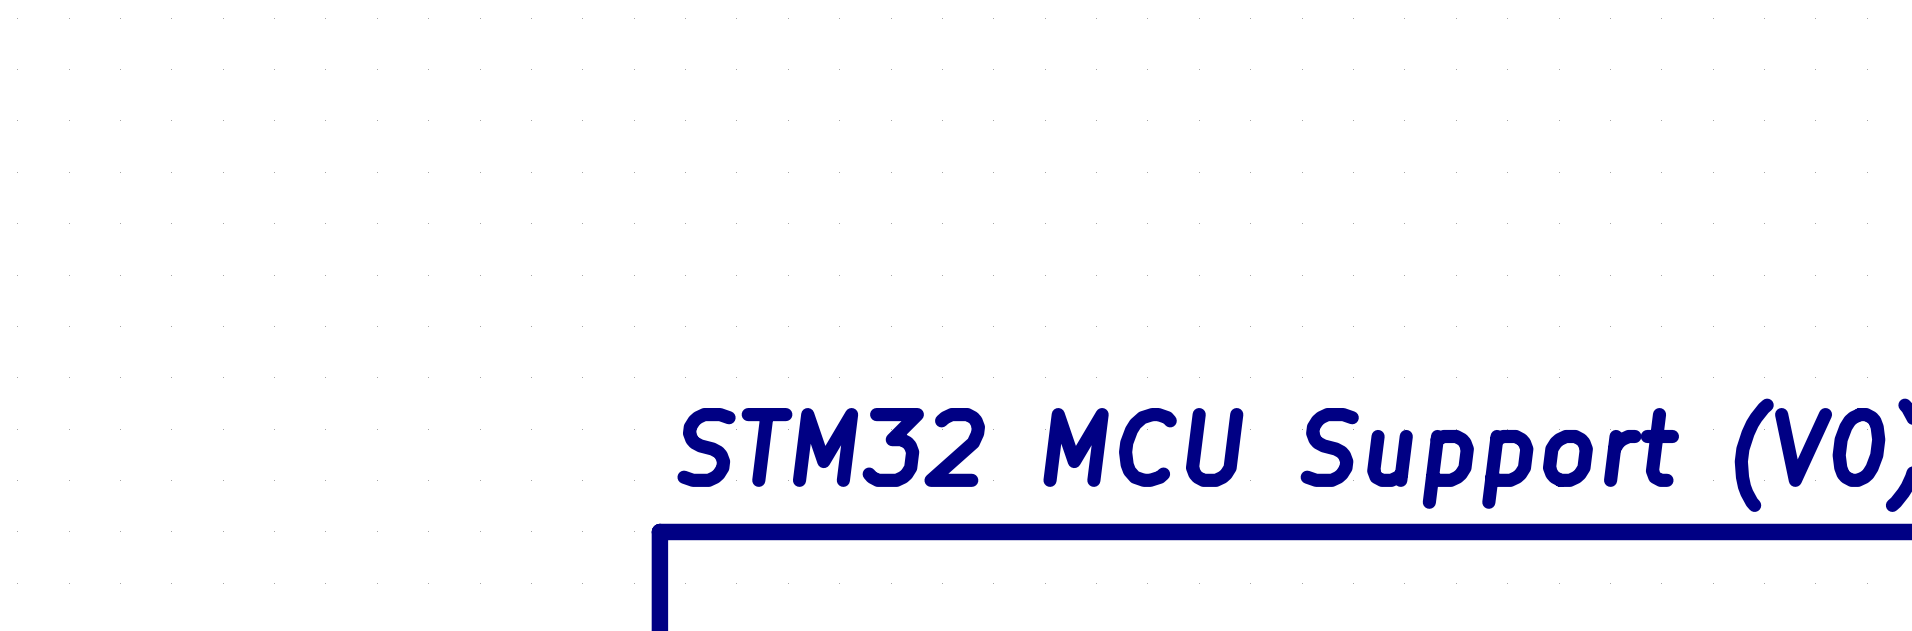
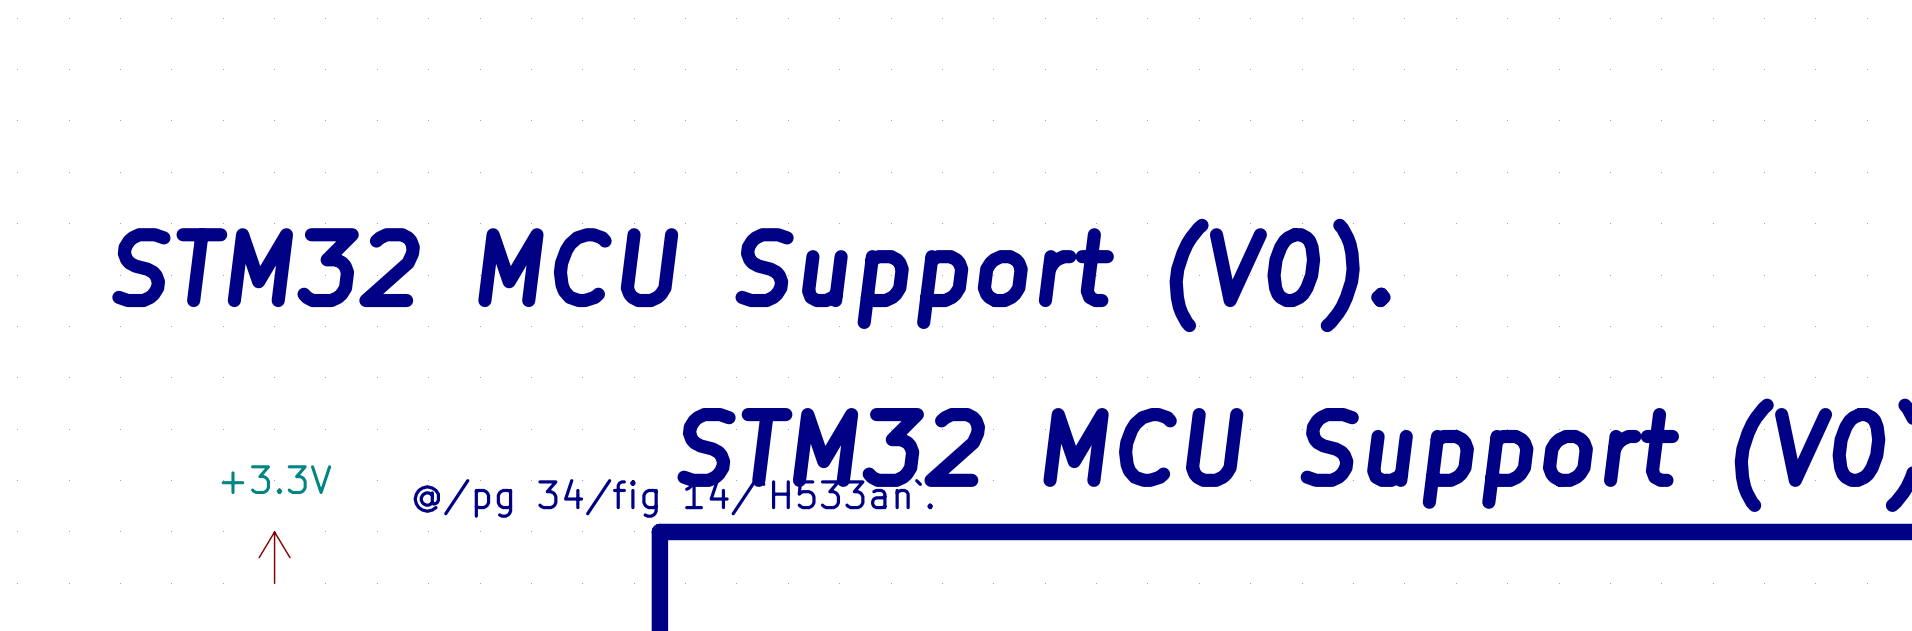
text: none -> STM32 MCU Support (V0). (751, 275)
text: none -> @/pg 34/fig 14/`H533an`. (673, 498)
power symbol: none -> +3.3V (274, 557)

